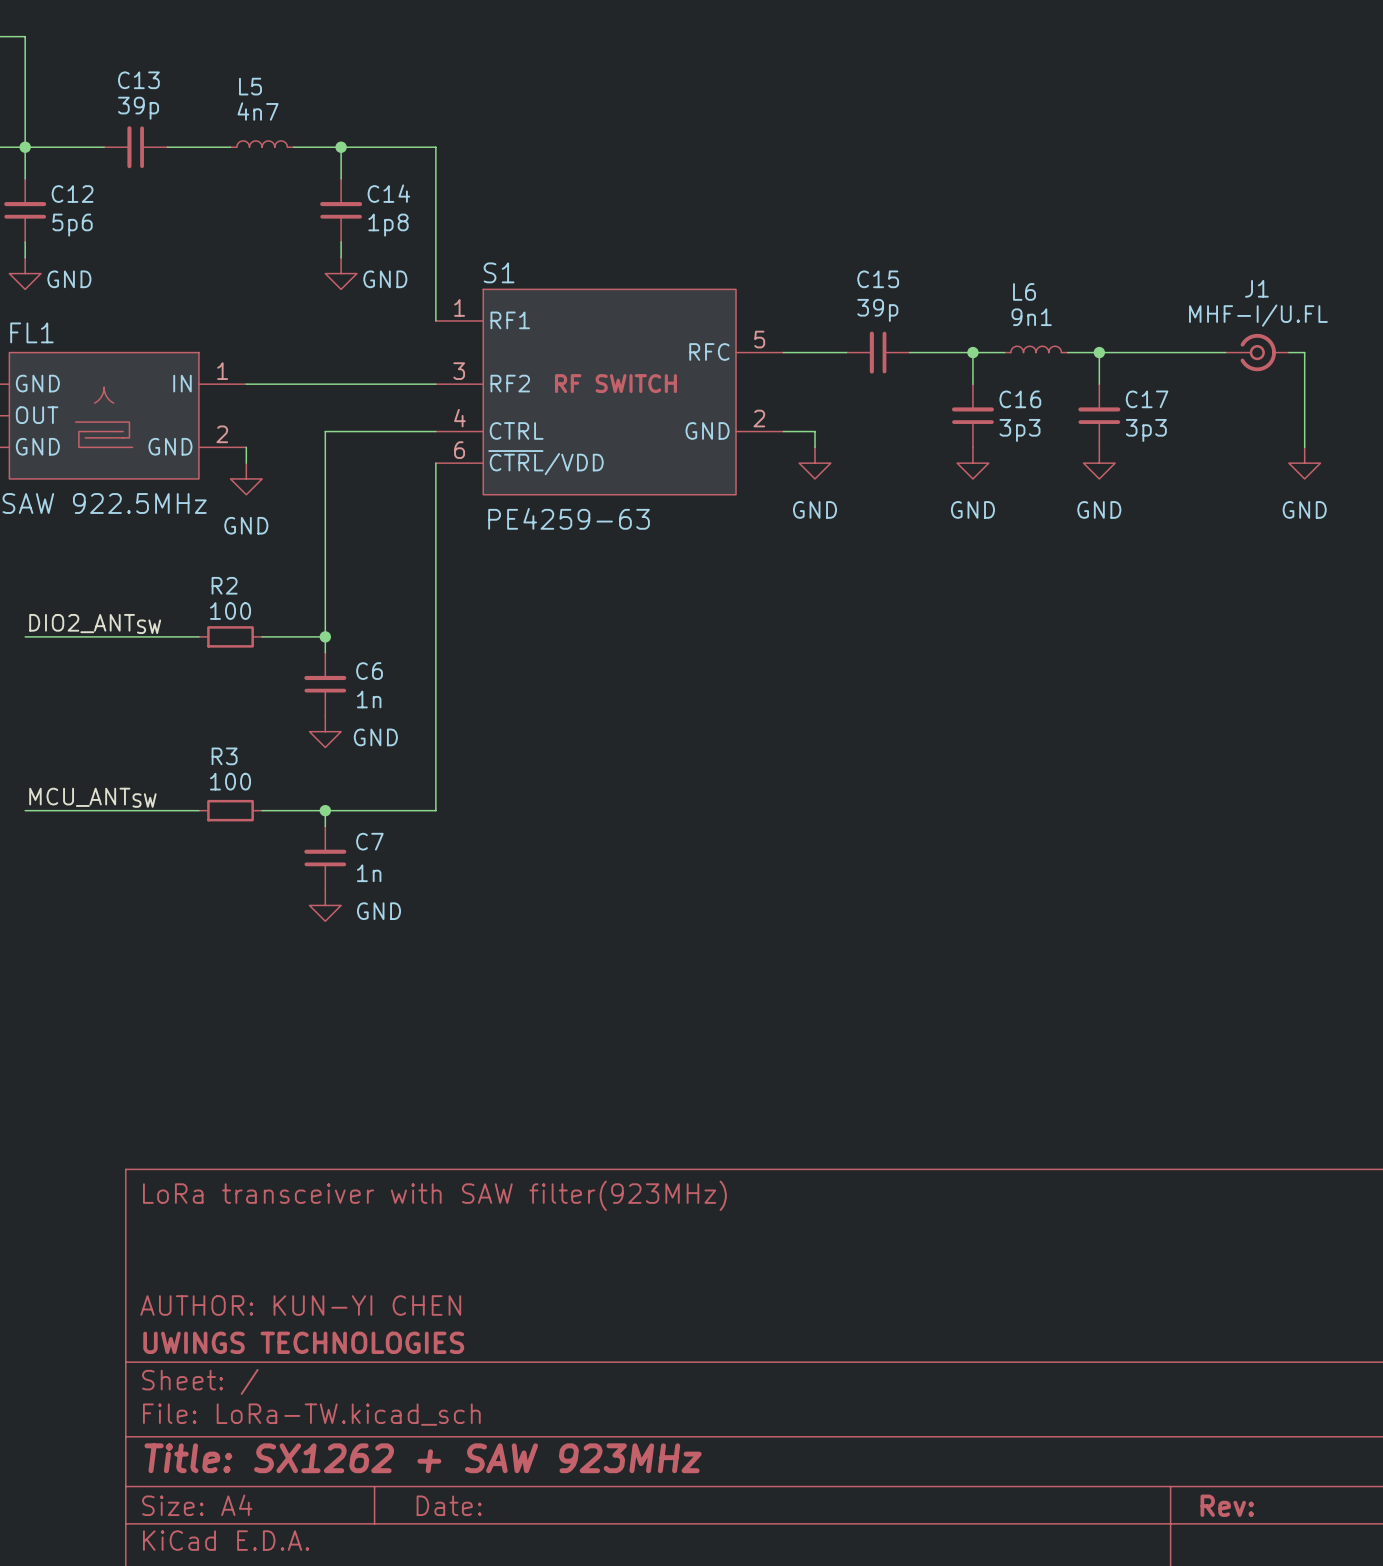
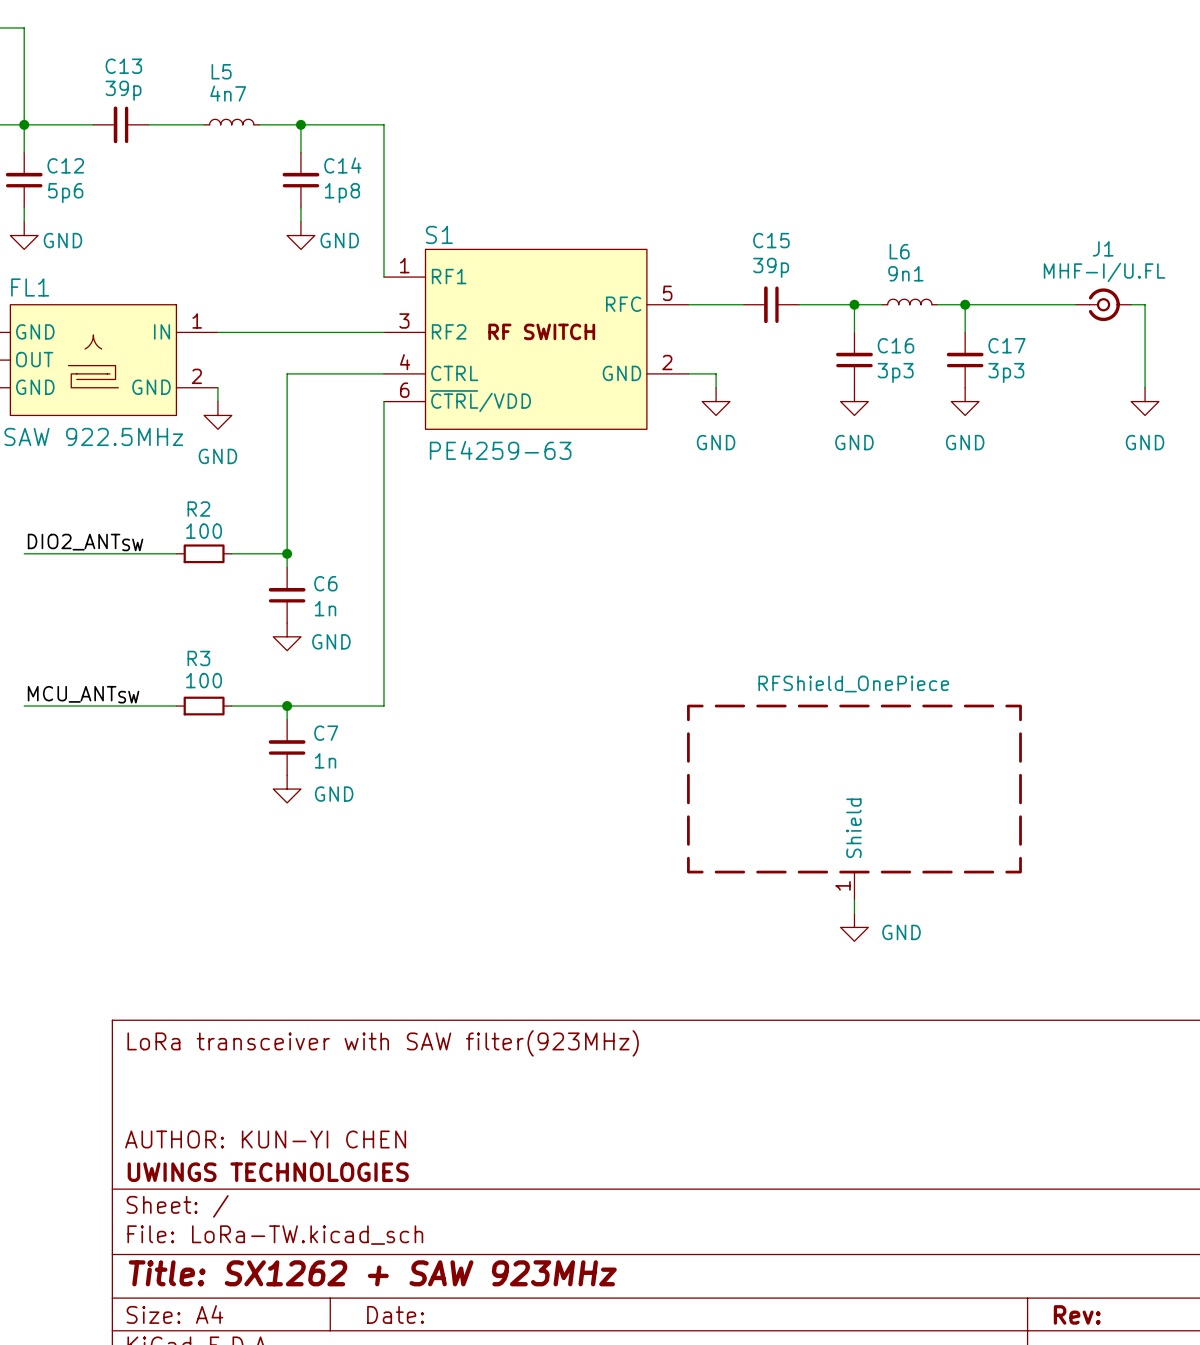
part: none -> RFShield_OnePiece (854, 802)
wire: none -> (854, 899) (854, 913)
power symbol: none -> GND (854, 927)

